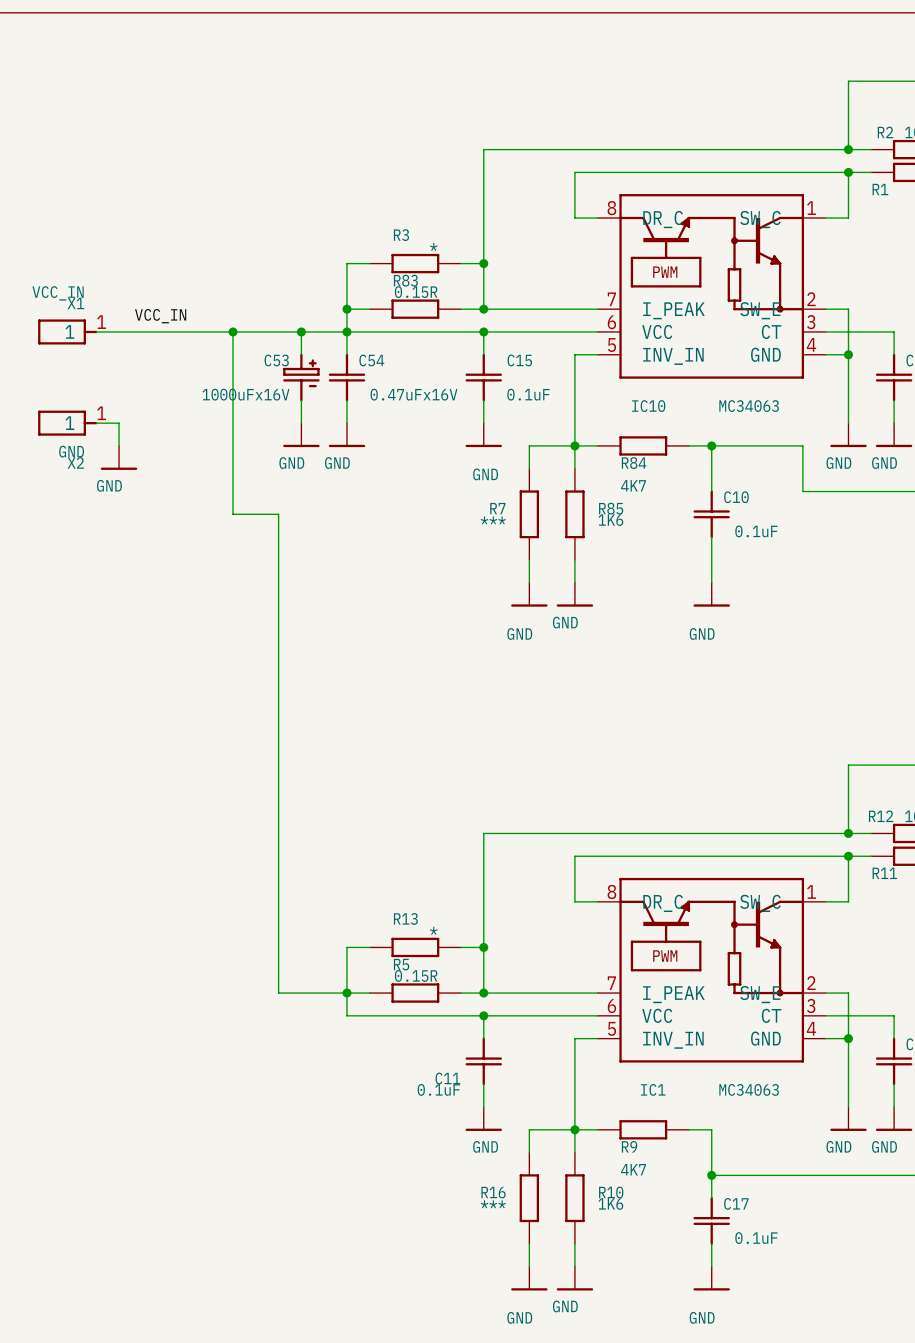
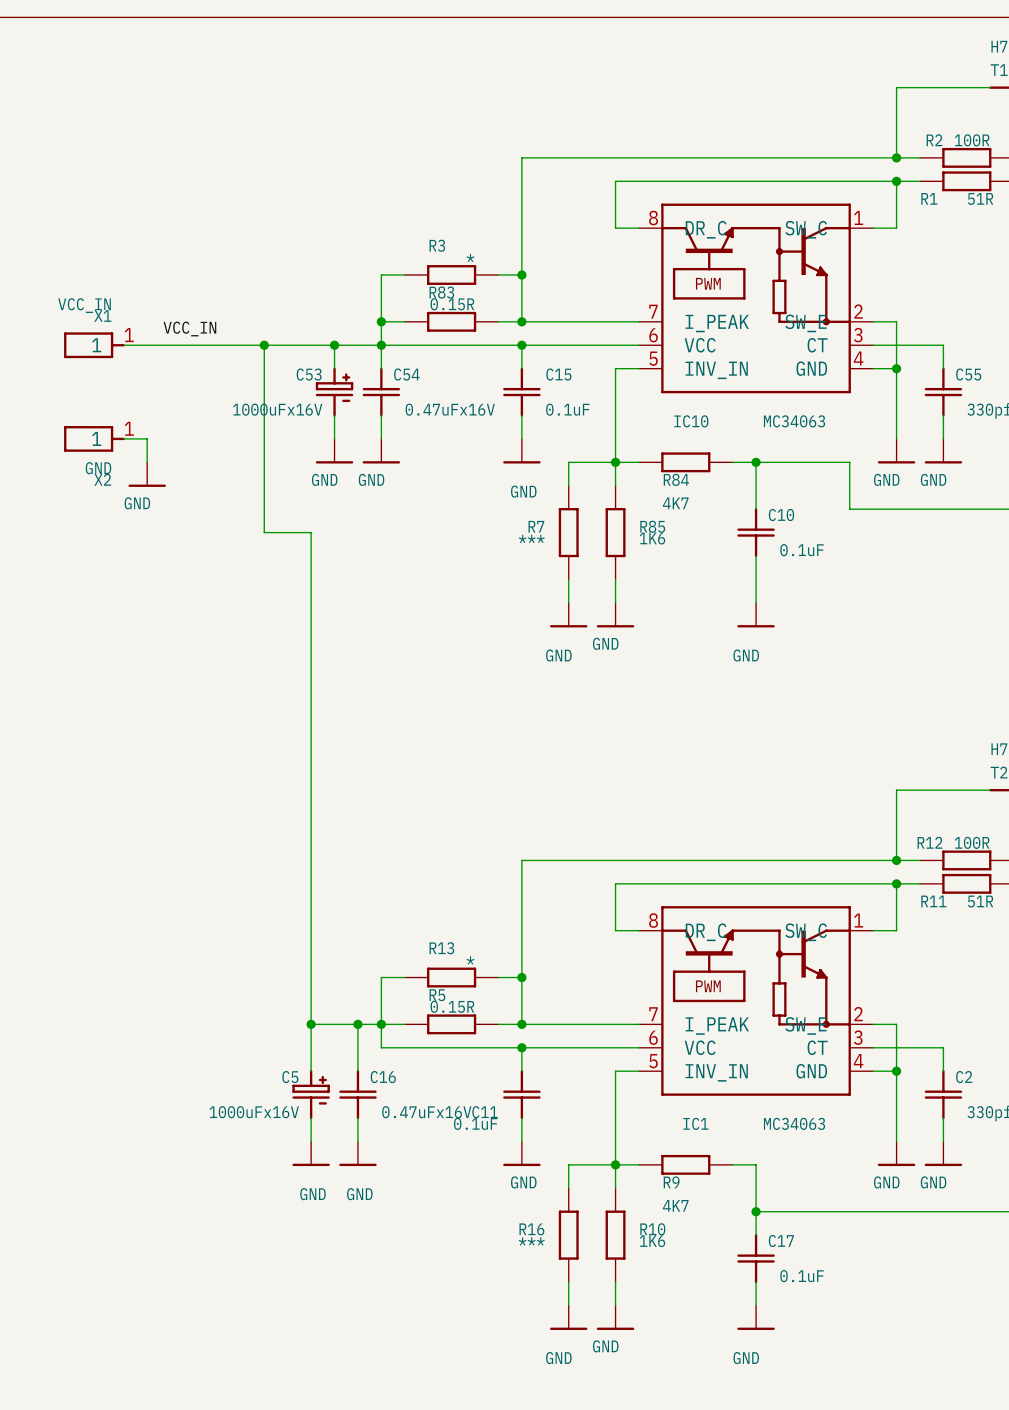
wire: none -> (311, 1024) (311, 1071)
junction: none -> (311, 1024)
wire: none -> (357, 1024) (357, 1071)
junction: none -> (357, 1024)
C5: none -> 1000uFx16V (311, 1094)
C16: none -> 0.47uFx16V (357, 1094)
wire: none -> (311, 1118) (311, 1141)
wire: none -> (357, 1118) (357, 1141)
power symbol: none -> GND (311, 1153)
power symbol: none -> GND (357, 1153)

